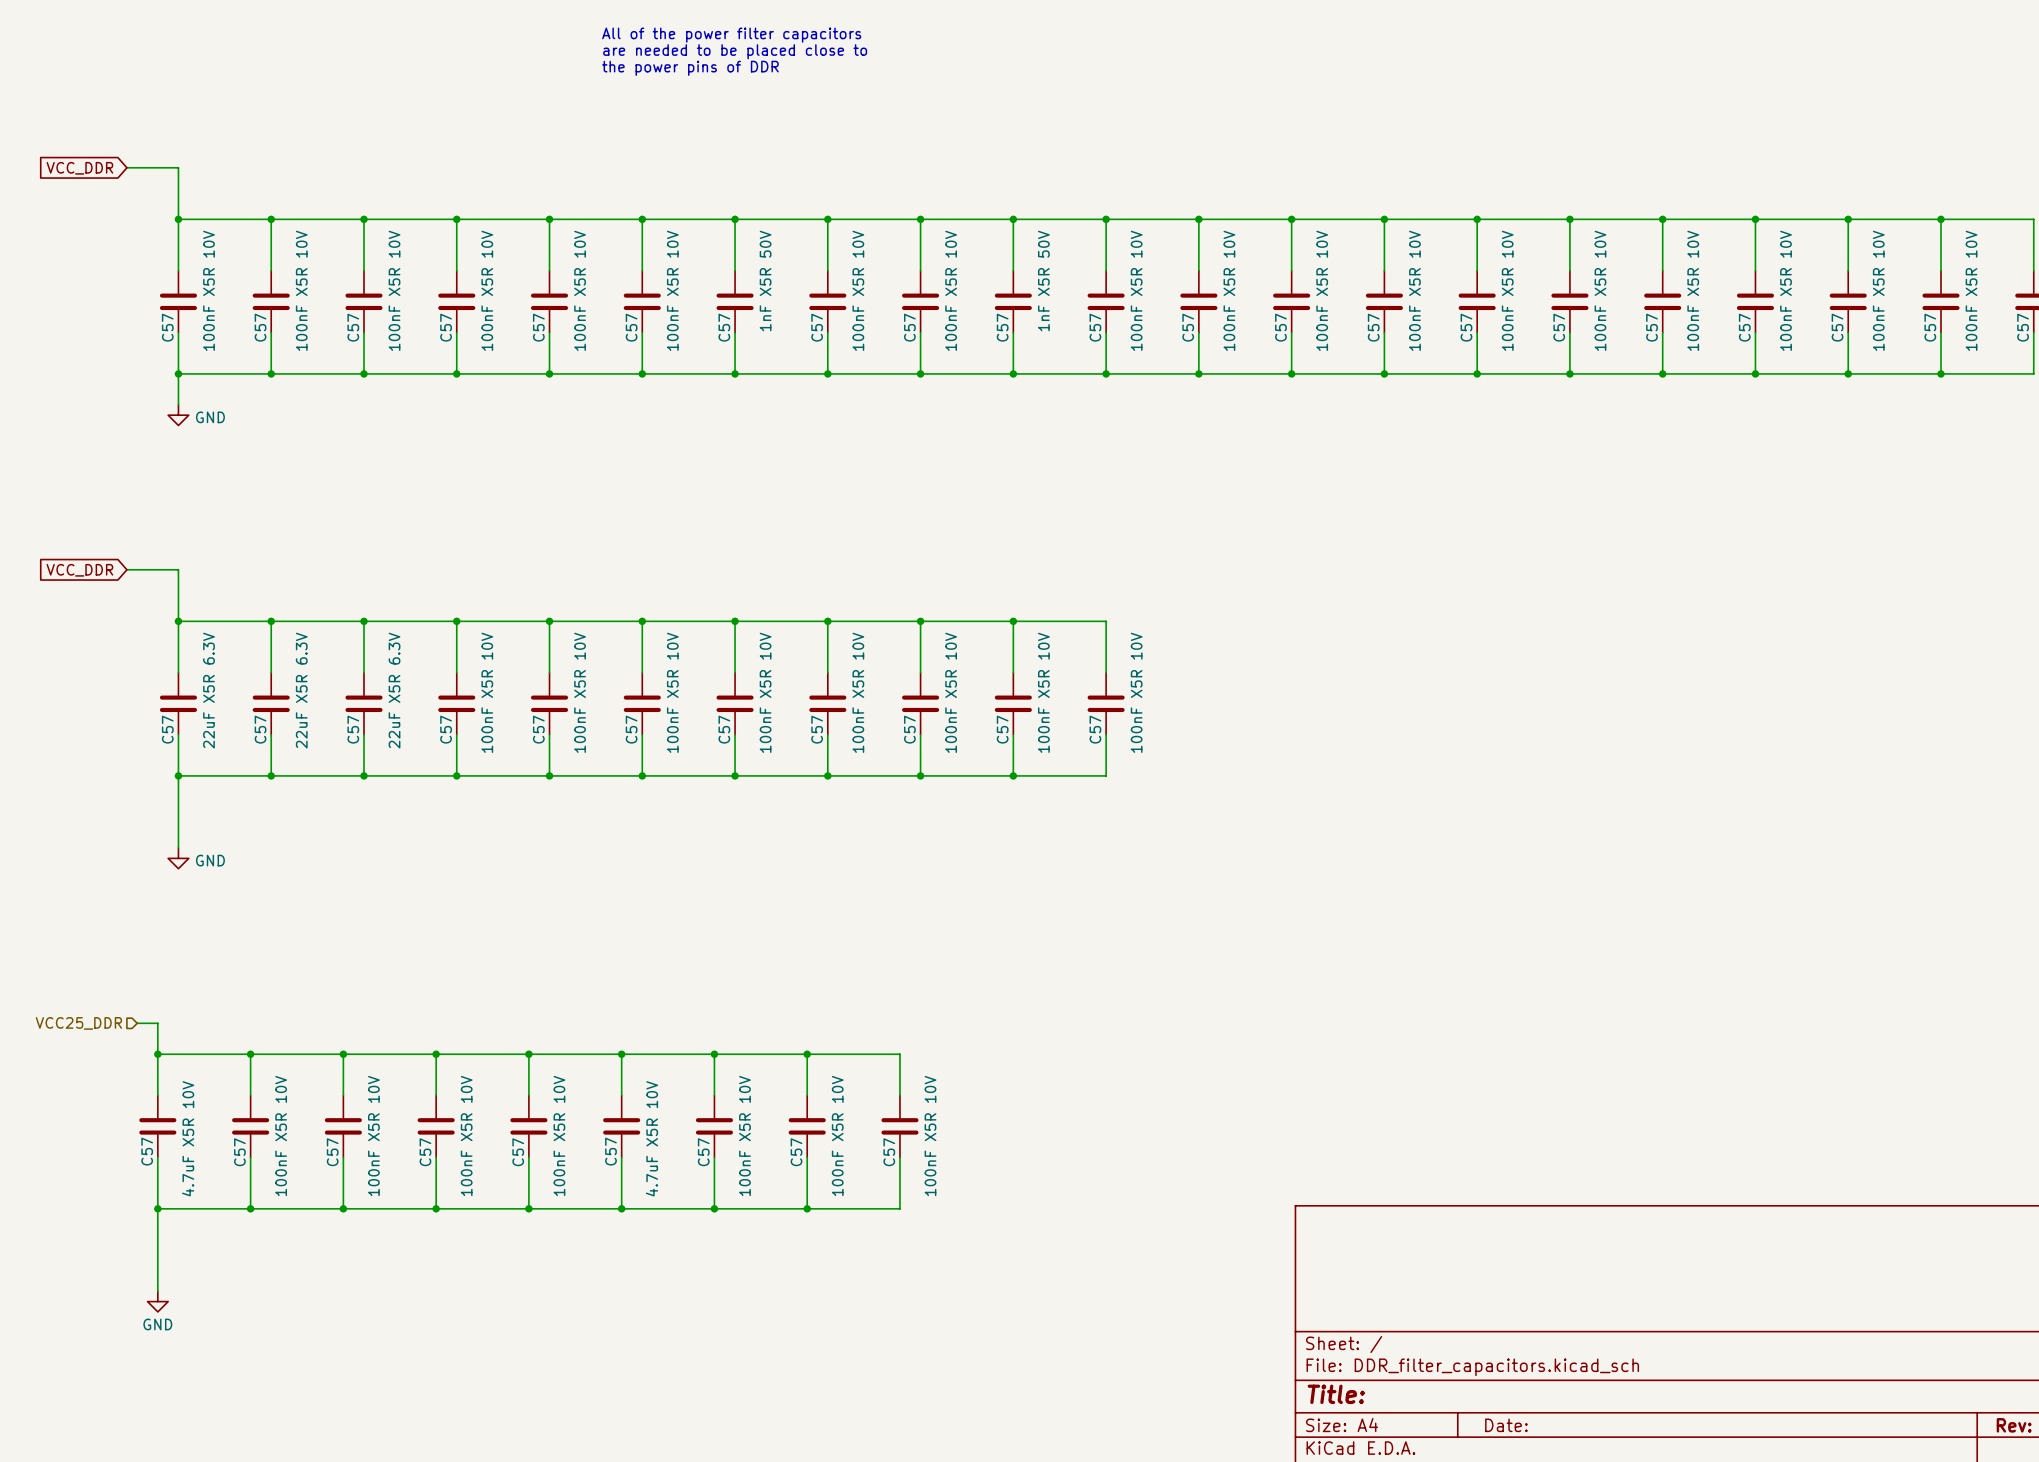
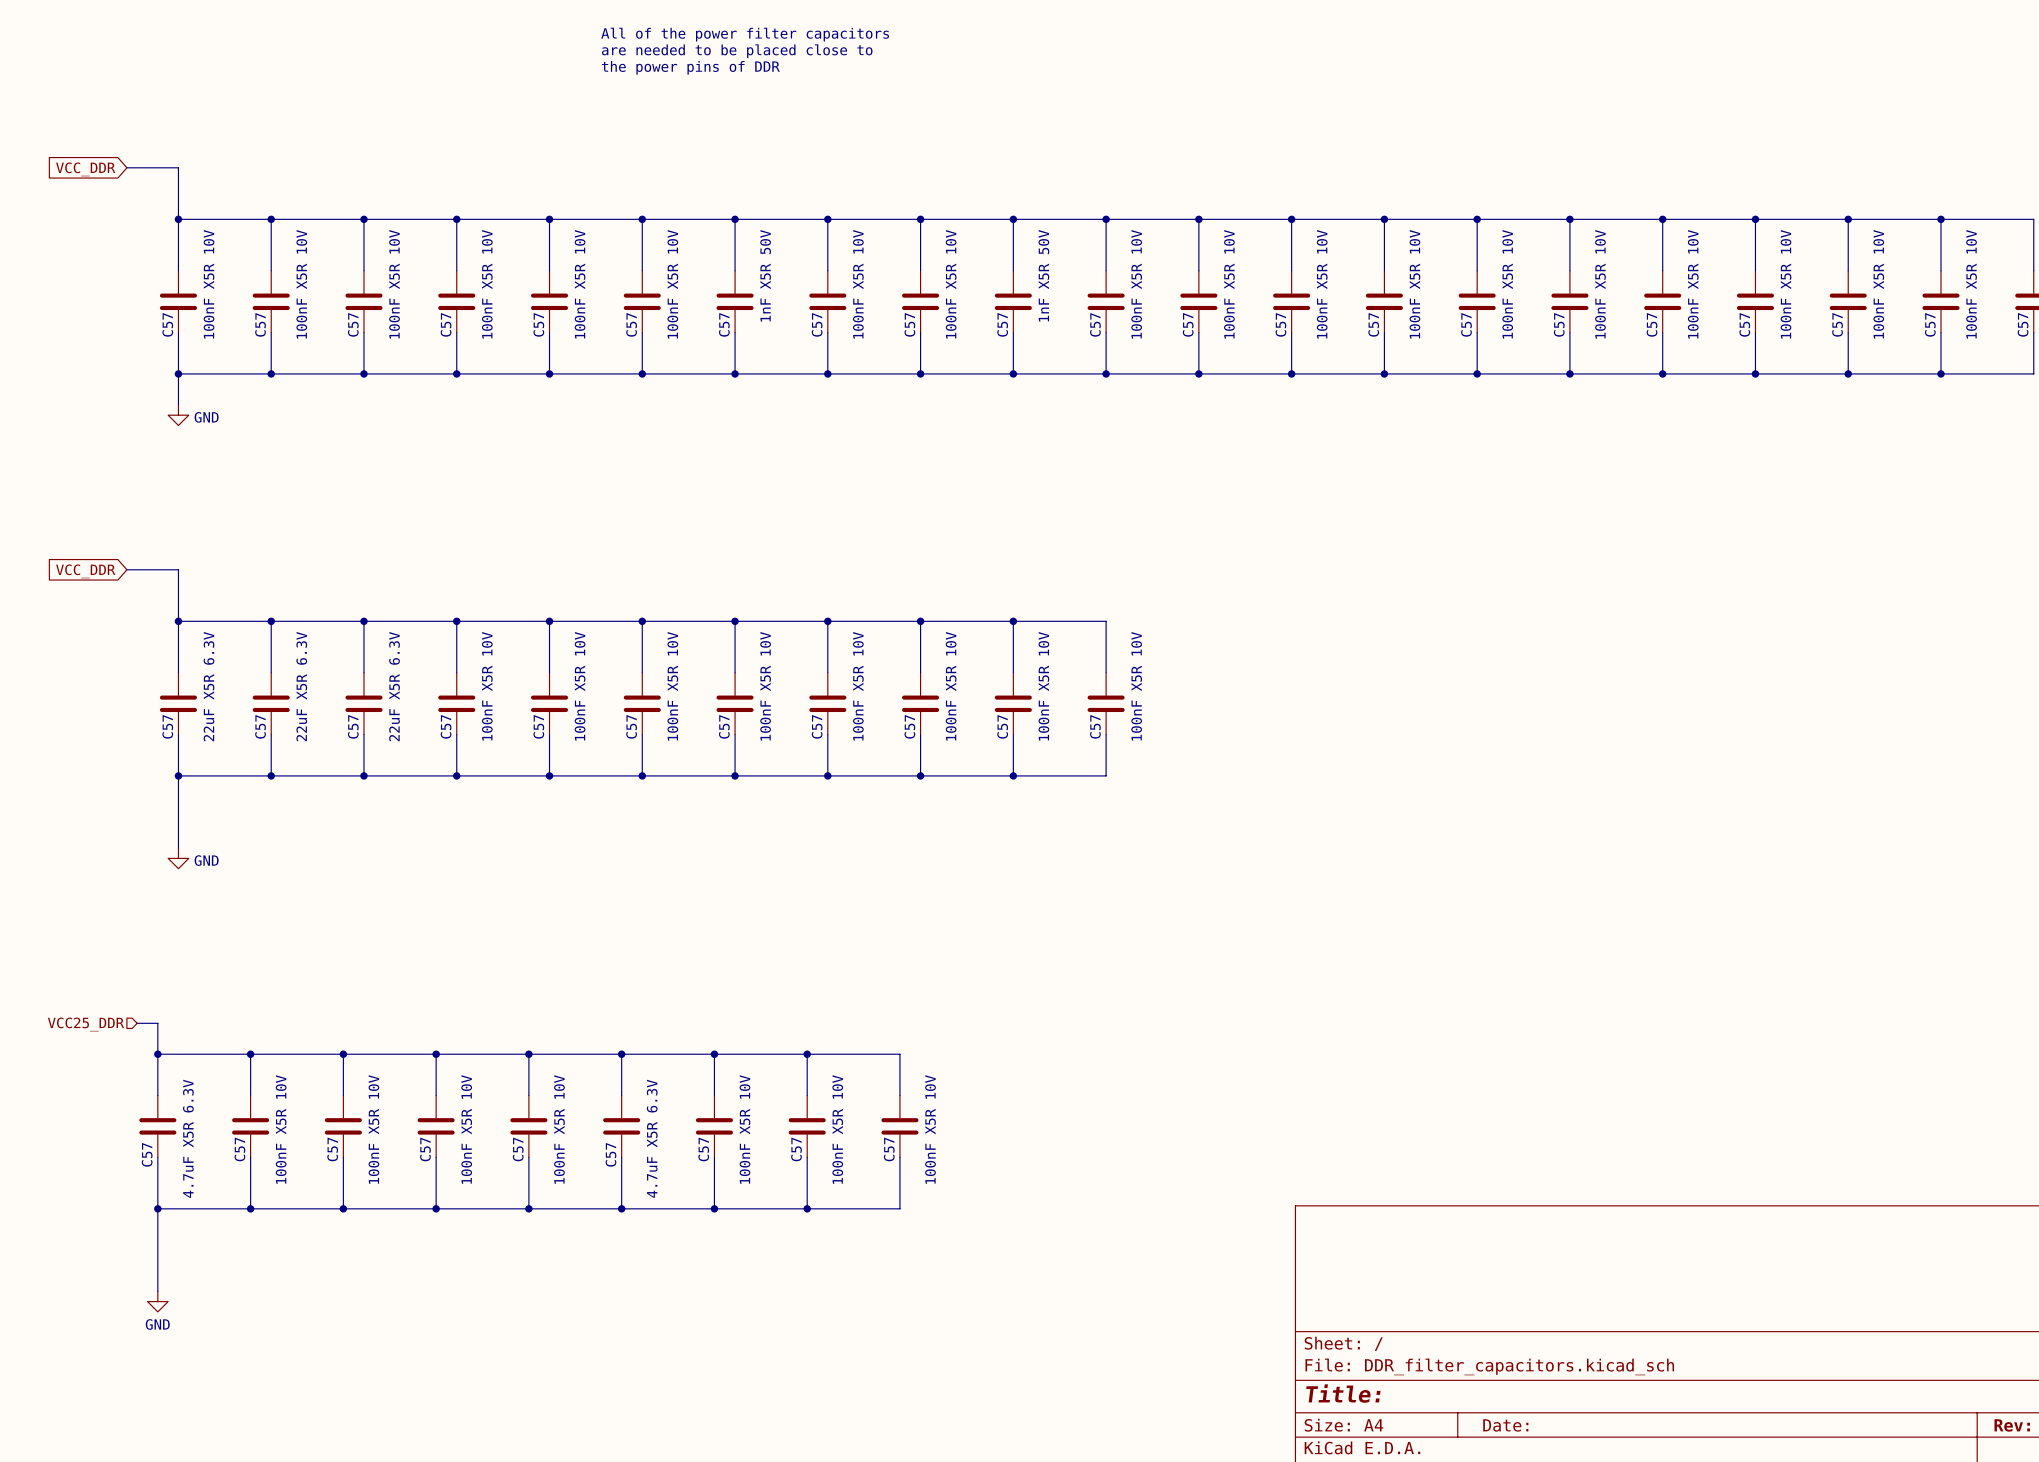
C57 value: 4.7uF X5R 10V (188, 1138) -> 4.7uF X5R 6.3V (188, 1138)
C57 value: 4.7uF X5R 10V (651, 1138) -> 4.7uF X5R 6.3V (652, 1138)

